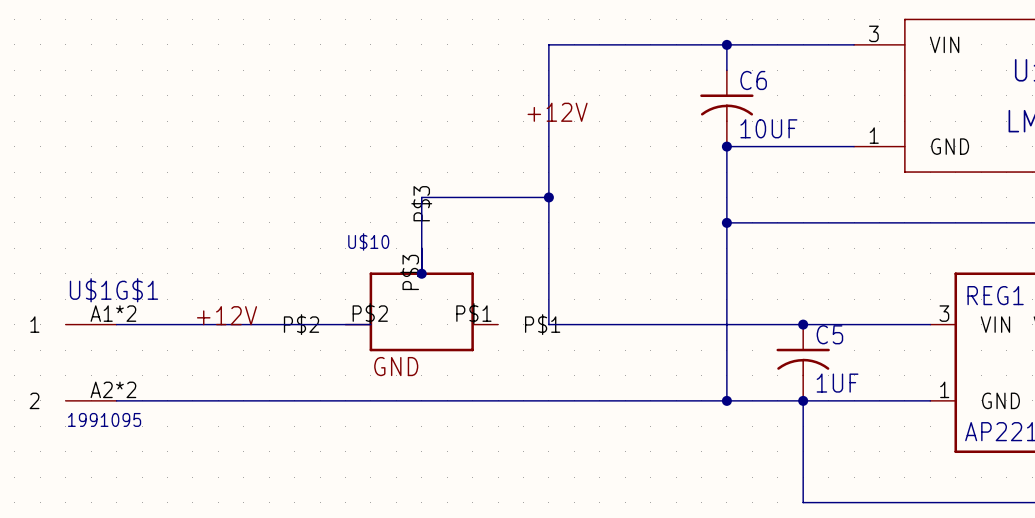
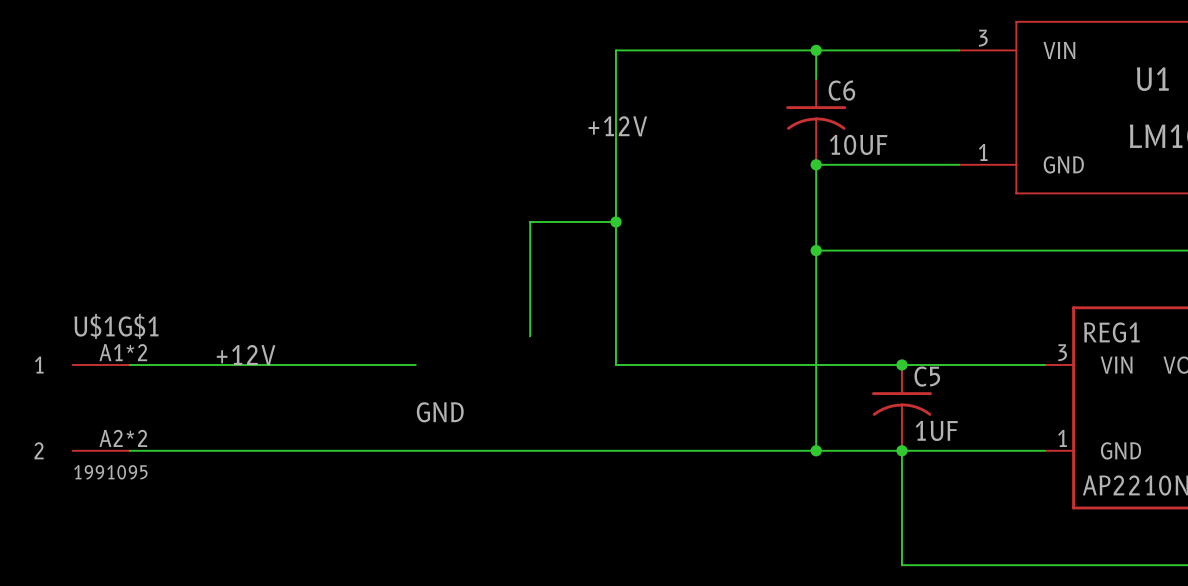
wire: (472, 197) (421, 197) (421, 273) -> (530, 222) (530, 336)
junction: (421, 273) -> none
U$10: (421, 299) -> none

